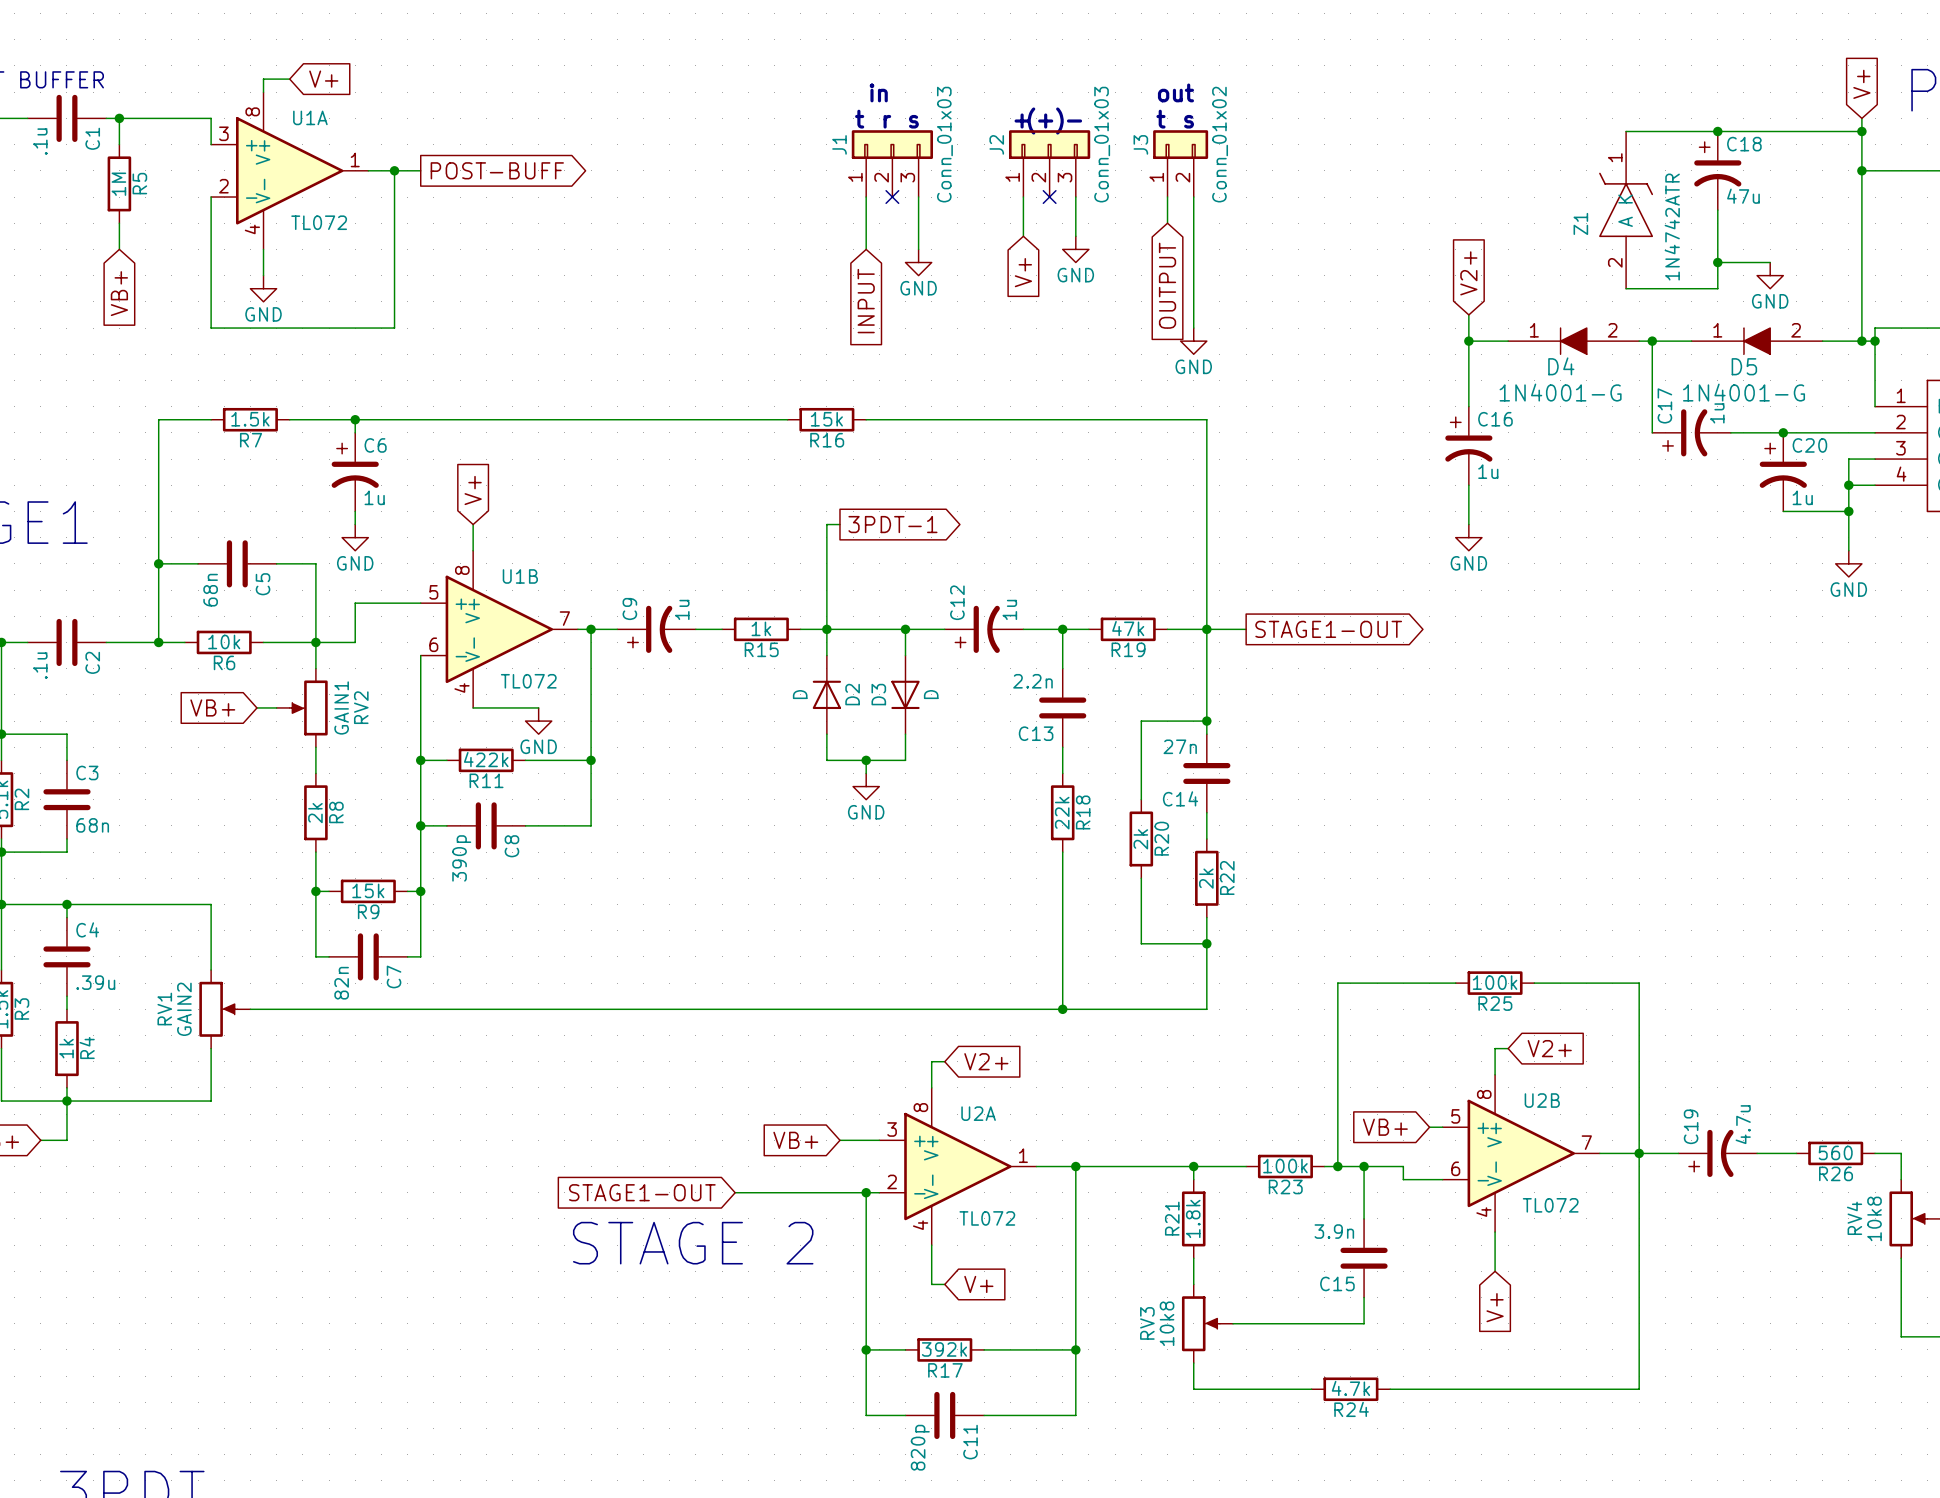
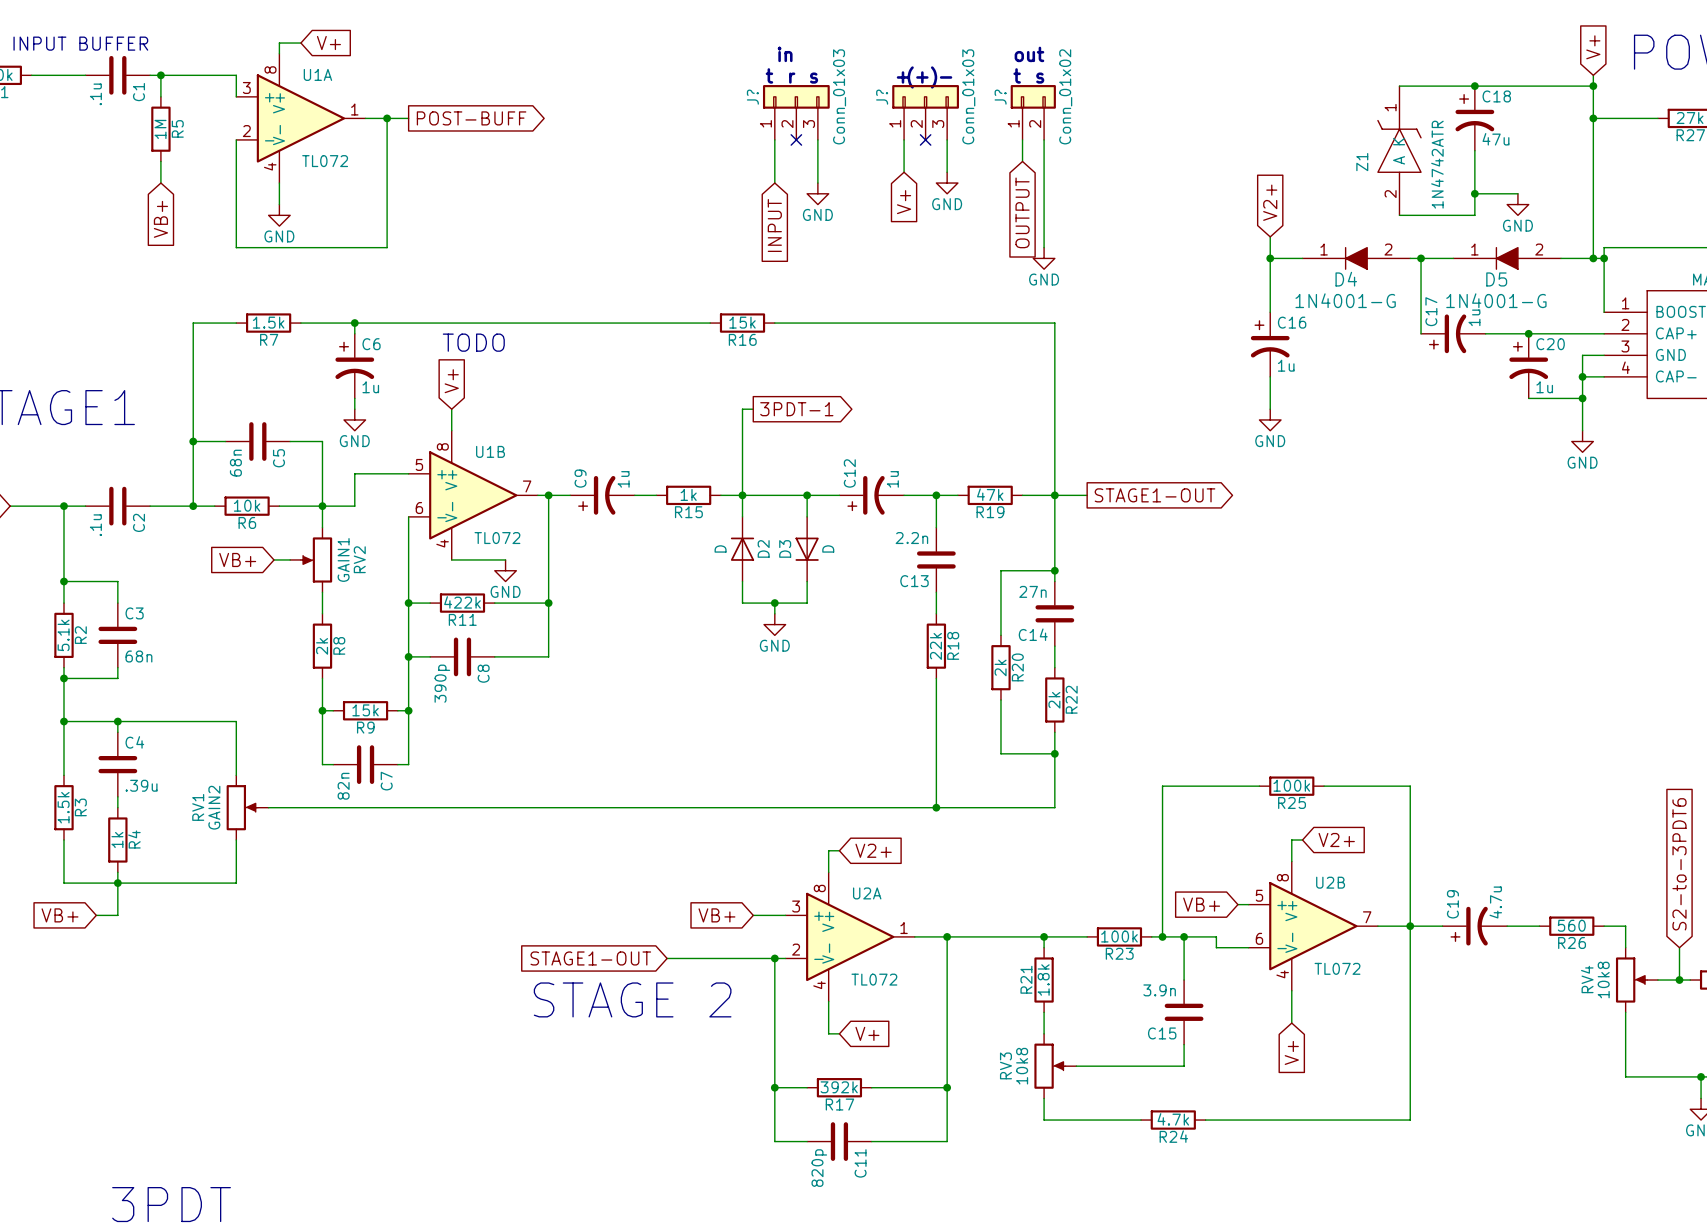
J1 name: J1 (839, 144) -> J? (752, 97)
J2 name: J2 (996, 144) -> J? (882, 97)
J3 name: J3 (1140, 144) -> J? (1000, 97)
text: none -> TODO (473, 342)

